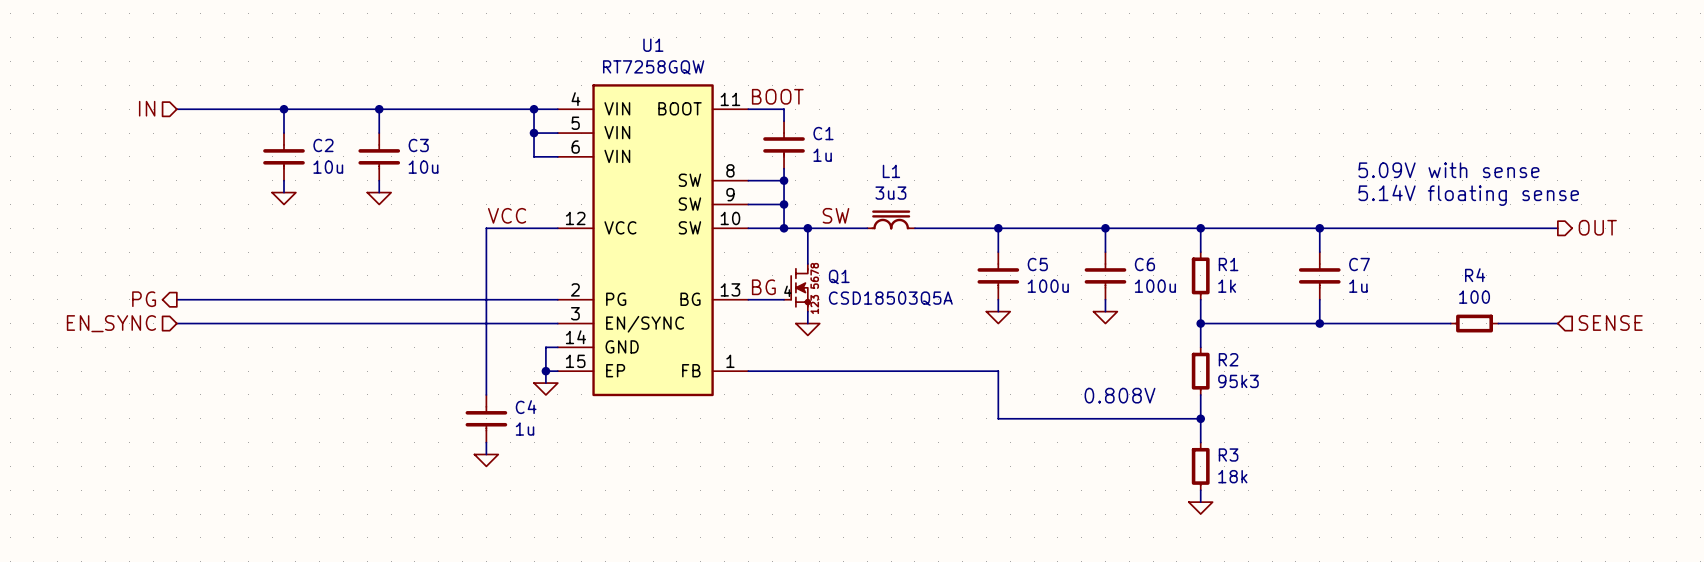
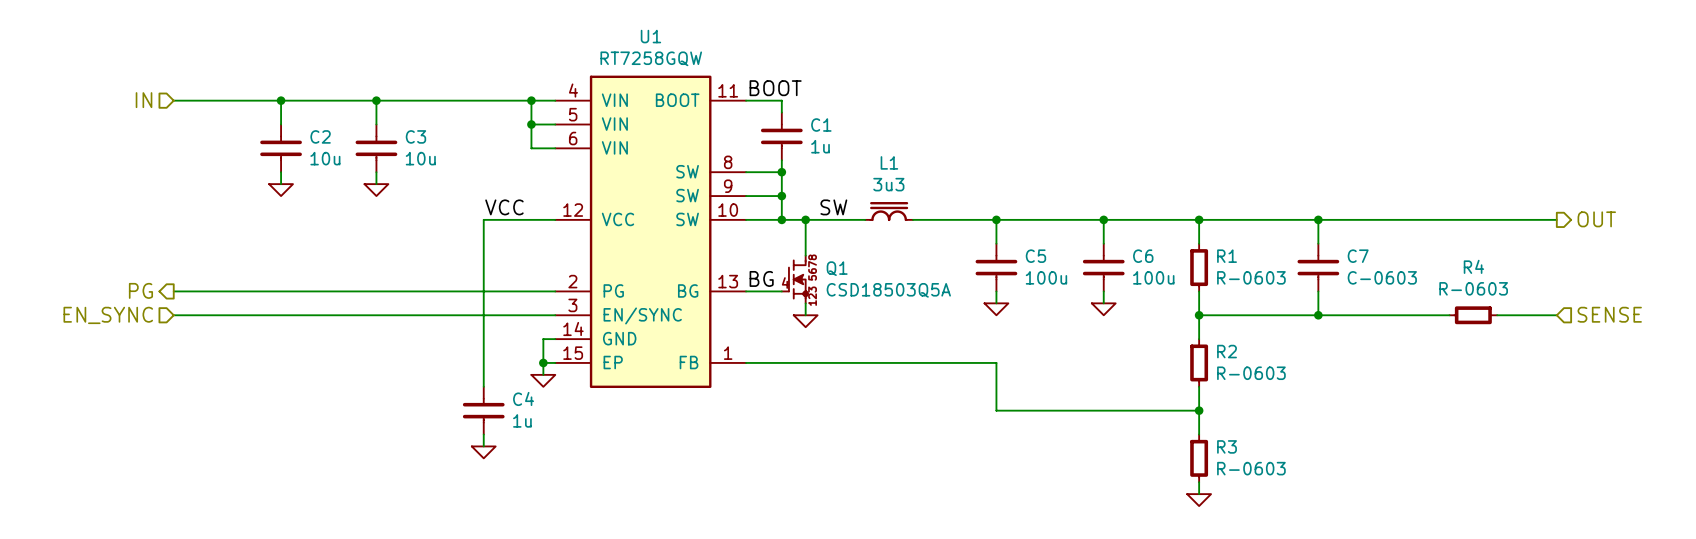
text: 5.09V with sense (1448, 170) -> none
text: 5.14V floating sense (1468, 195) -> none
R1 value: 1k (1227, 286) -> R-0603 (1251, 277)
C7 value: 1u (1358, 286) -> C-0603 (1382, 277)
R4 value: 100 (1474, 297) -> R-0603 (1473, 288)
R2 value: 95k3 (1238, 381) -> R-0603 (1251, 373)
text: 0.808V (1120, 395) -> none
R3 value: 18k (1232, 476) -> R-0603 (1251, 468)

